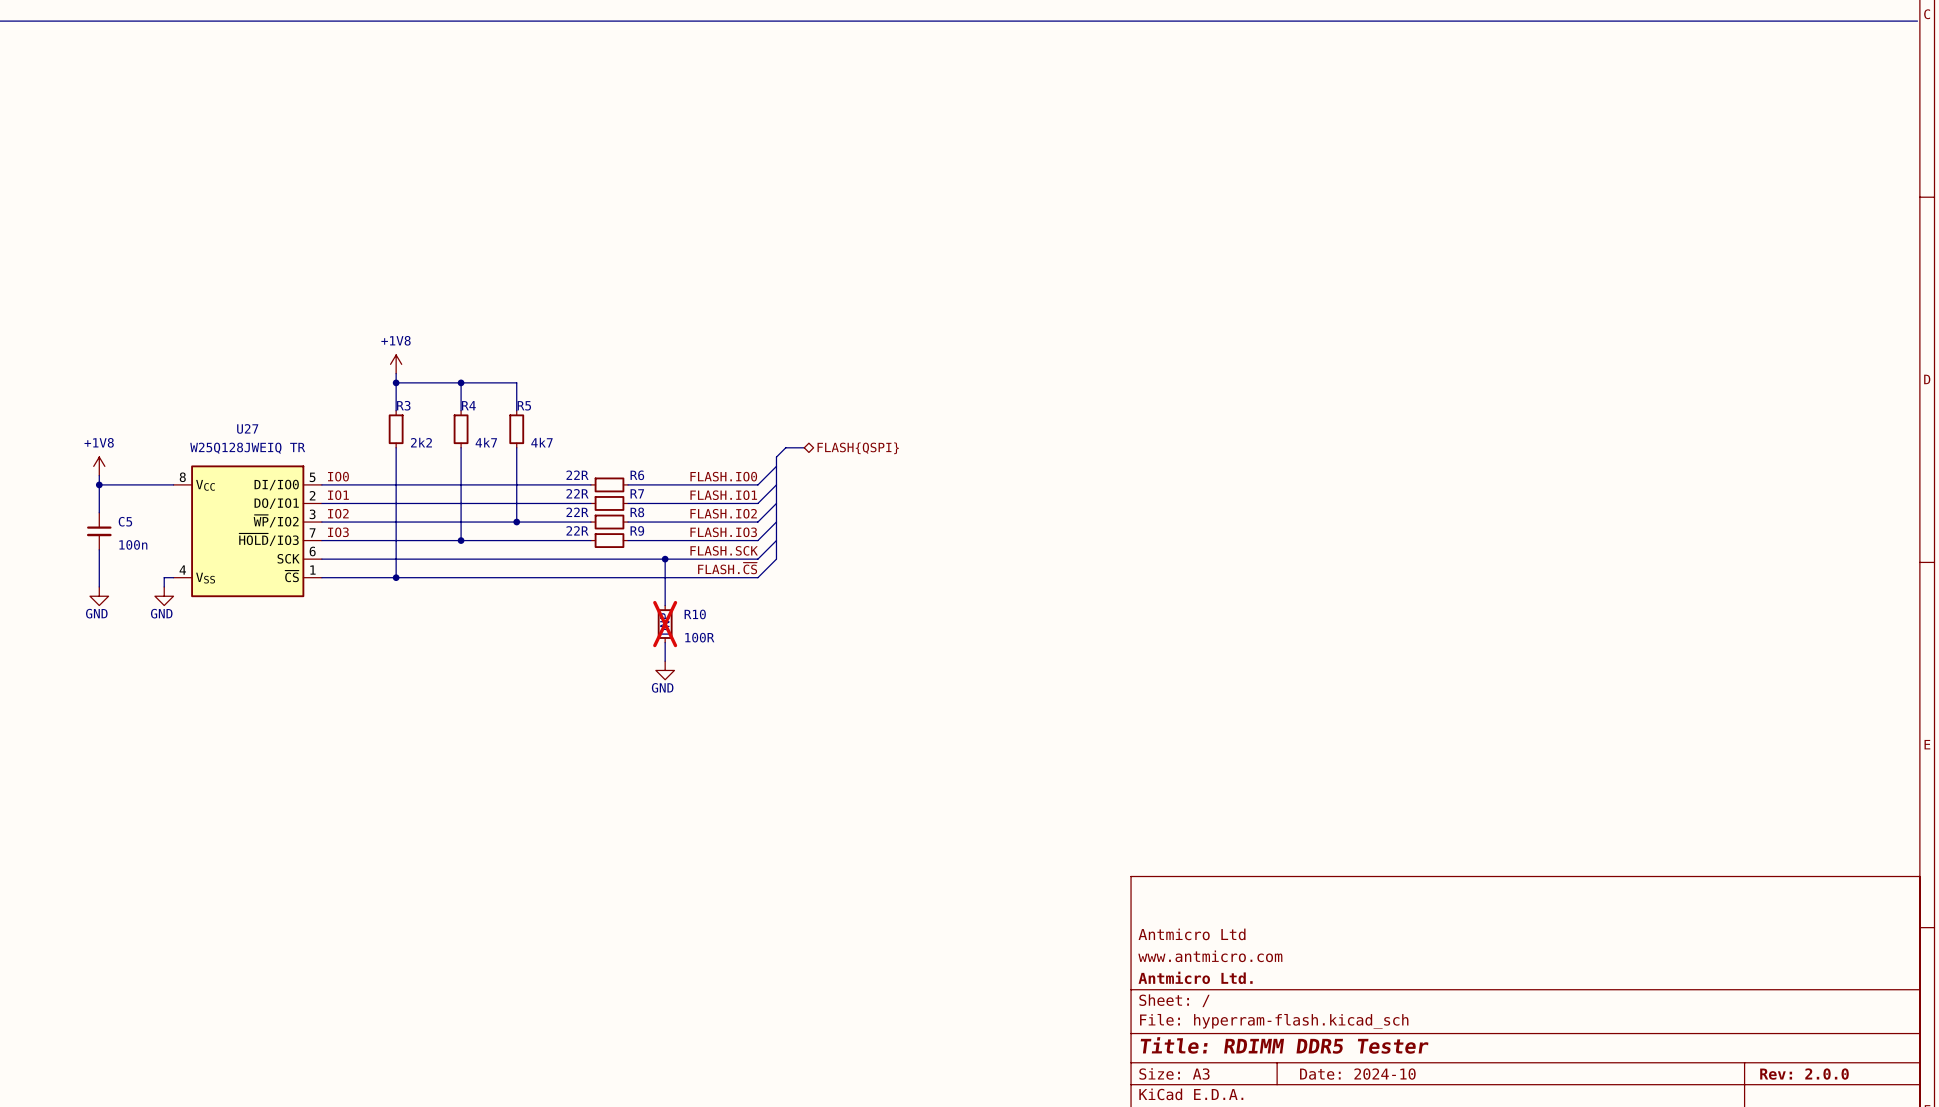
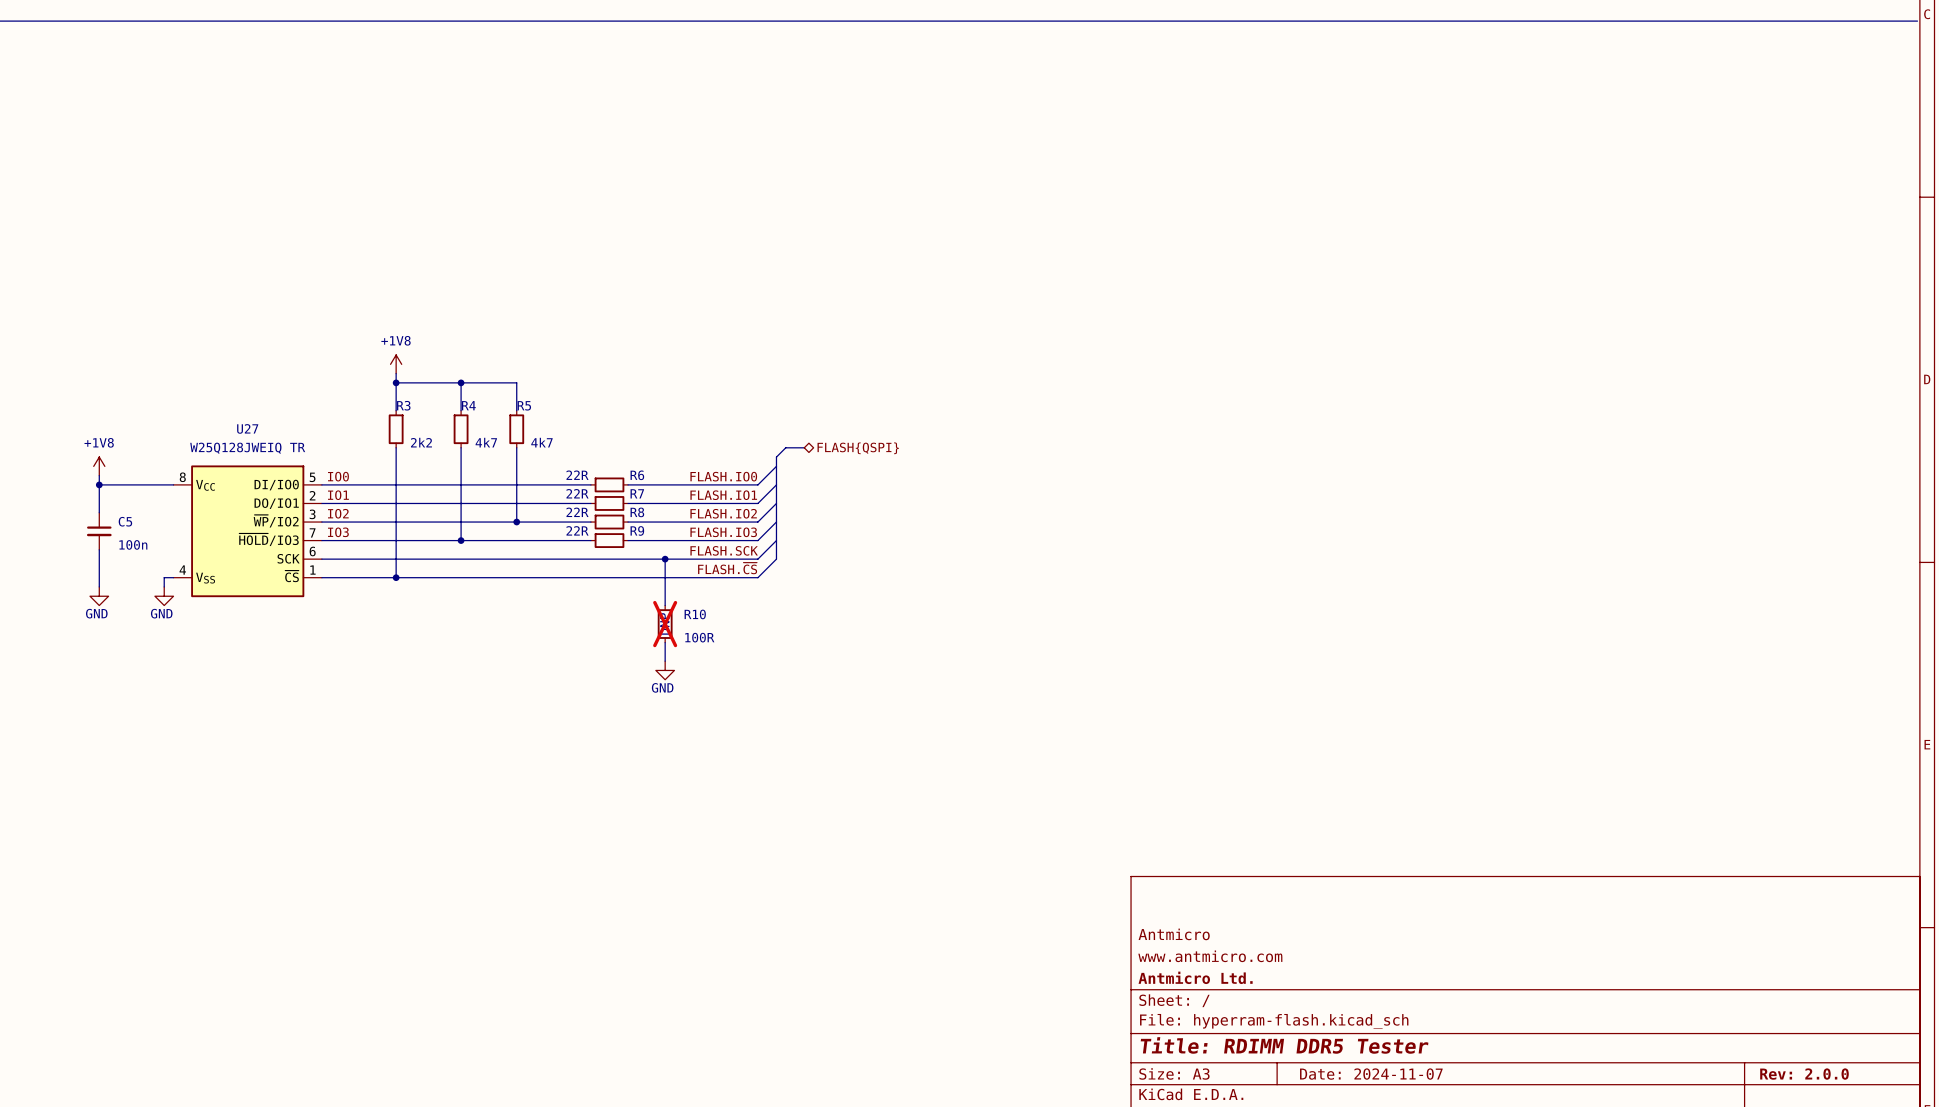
title block: Antmicro Ltd (1192, 934) -> Antmicro (1174, 934)
title block: Date: 2024-10 (1357, 1074) -> Date: 2024-11-07 (1371, 1074)

